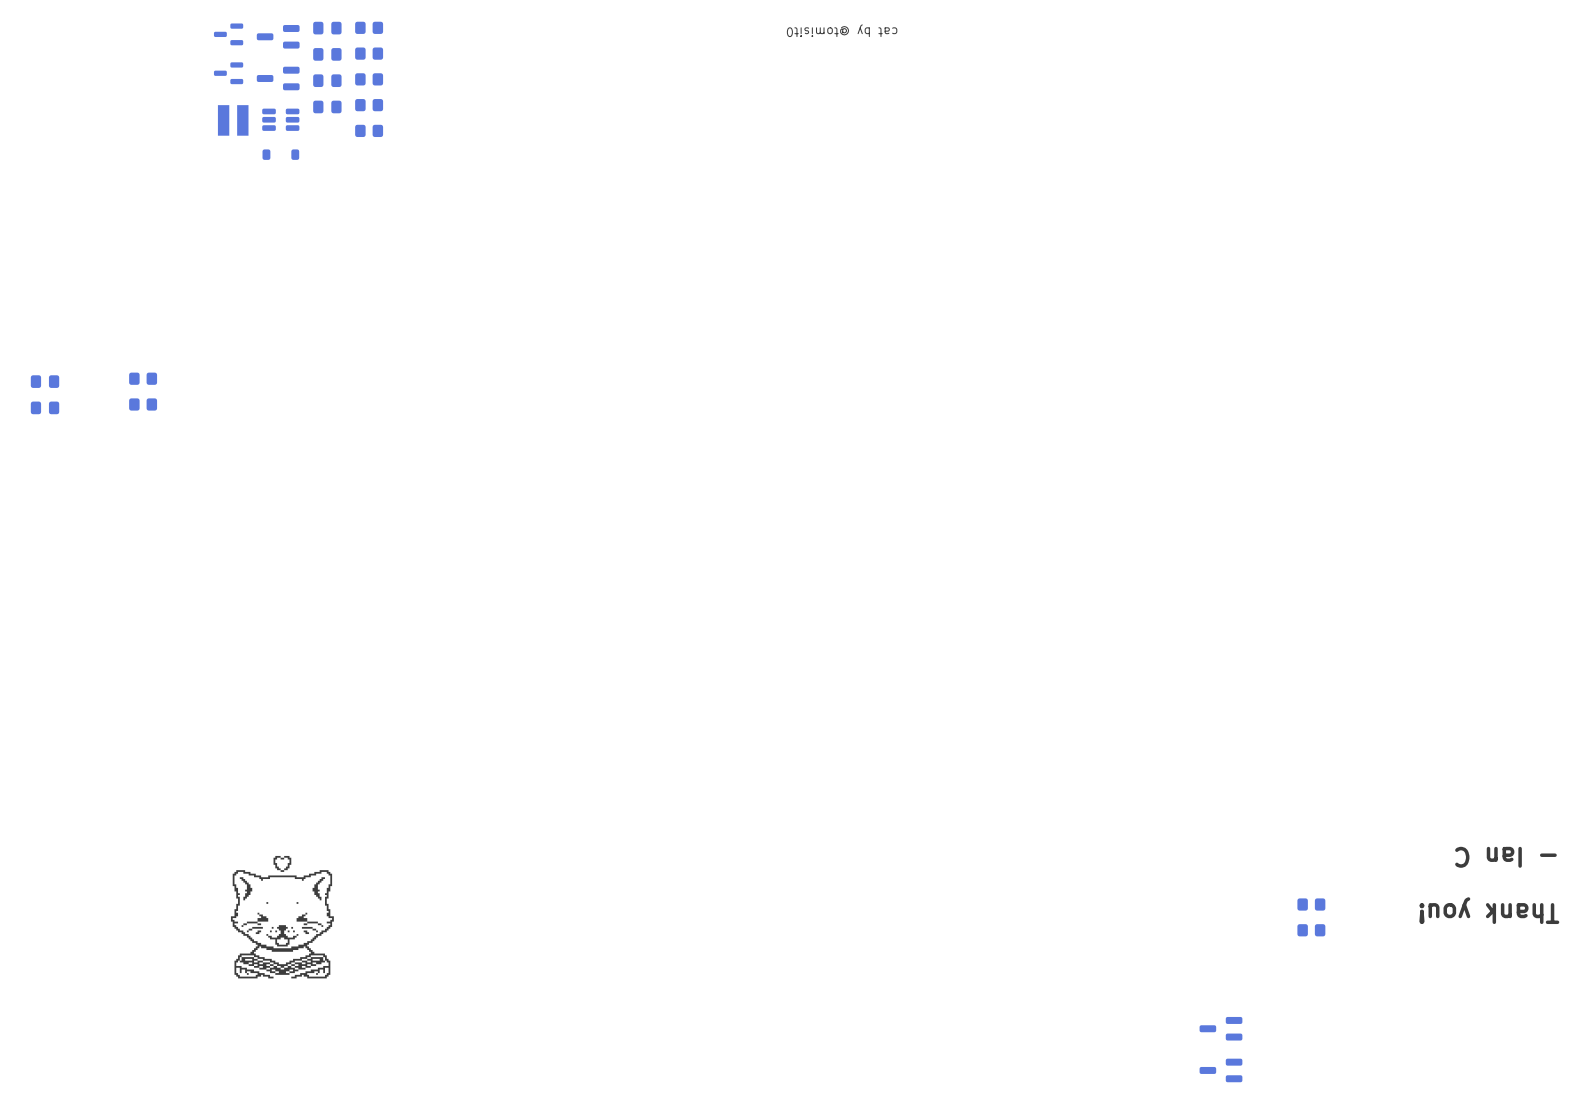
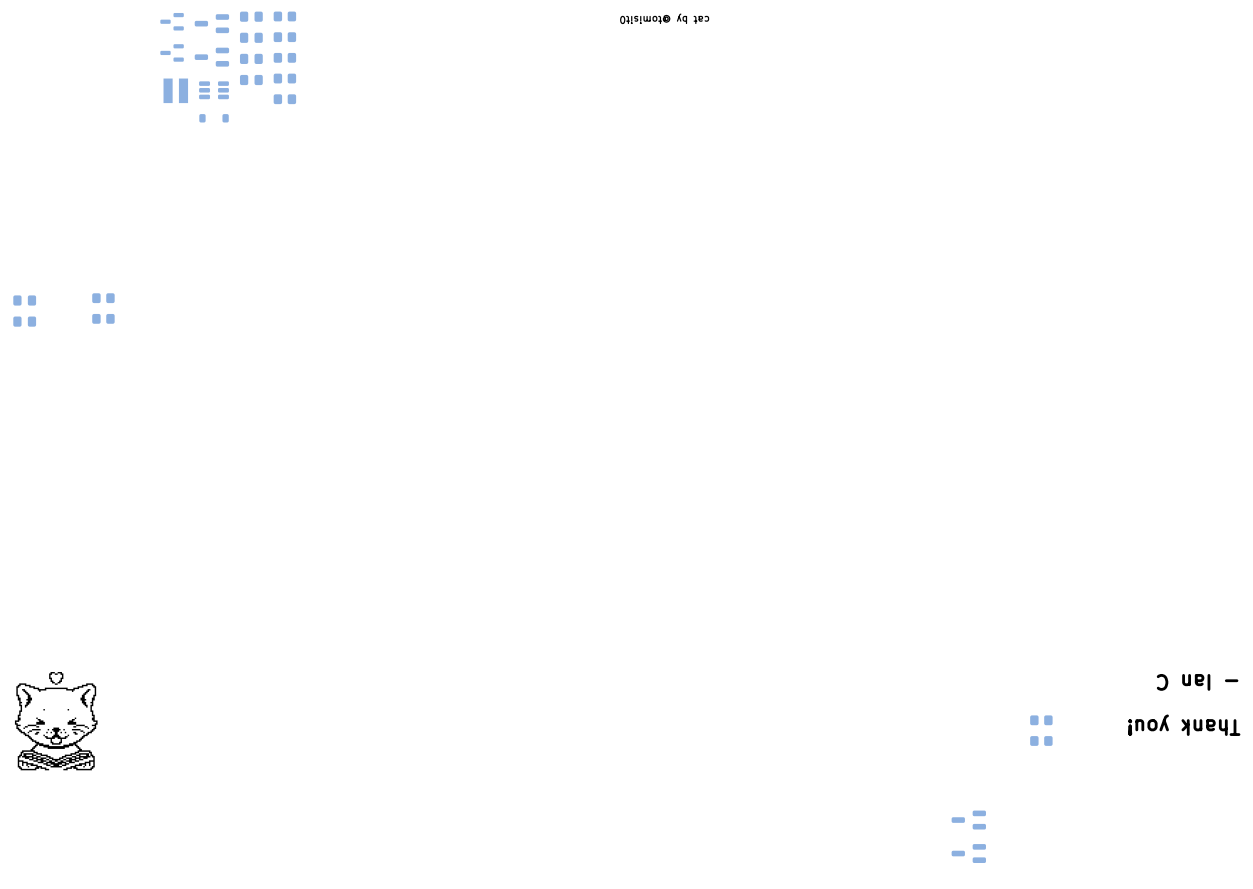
drawing position: (282, 917) -> (56, 721)

